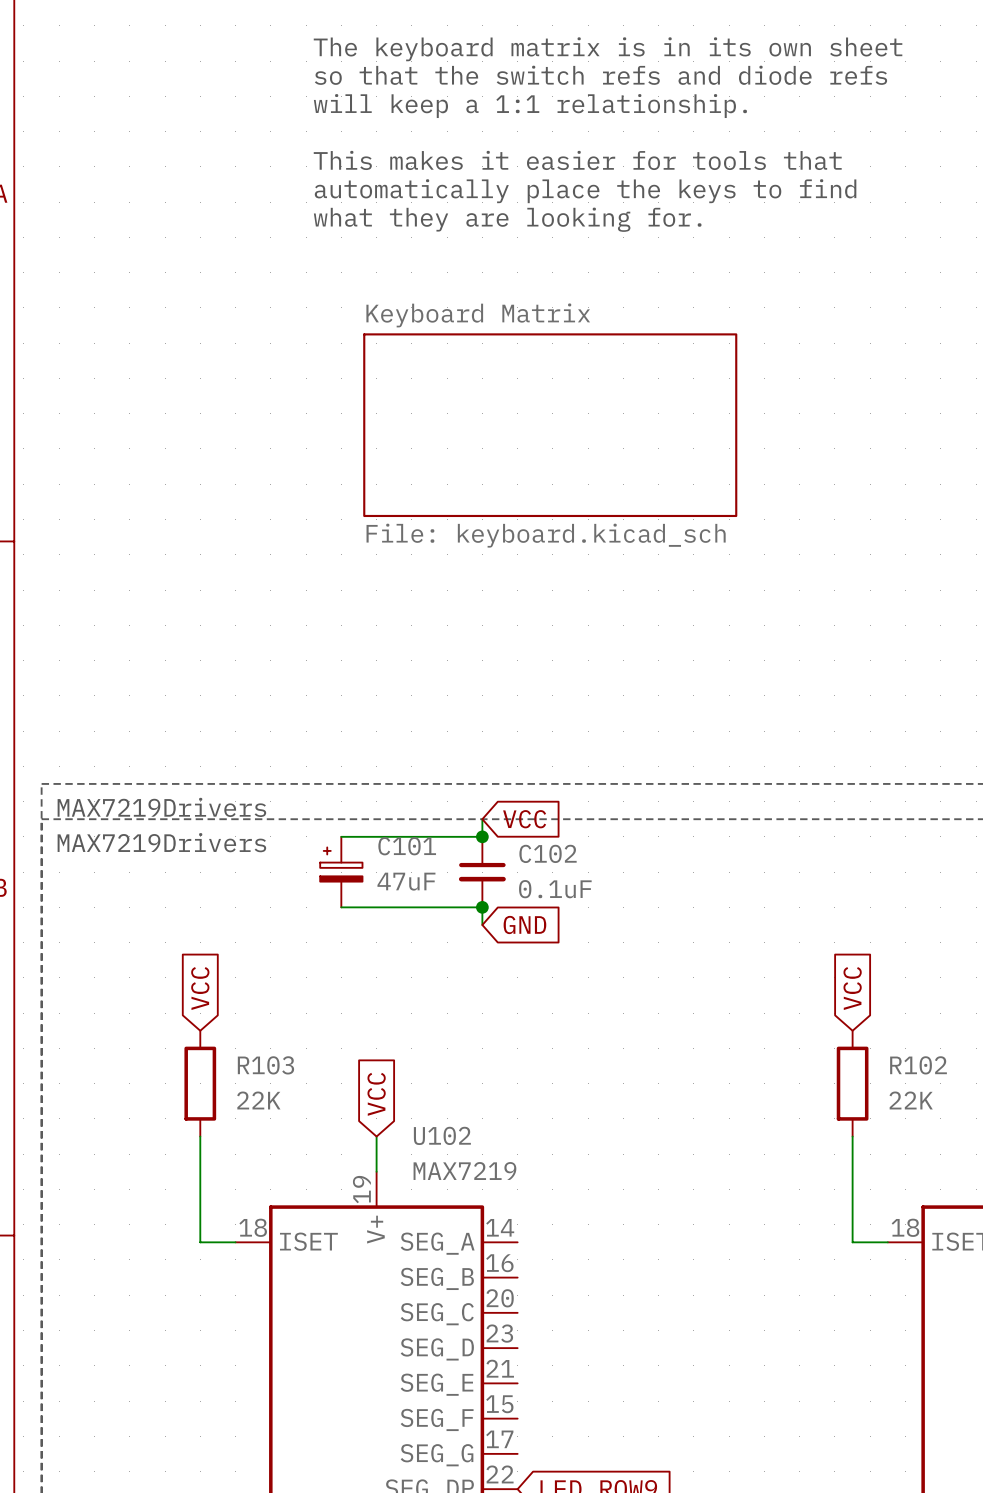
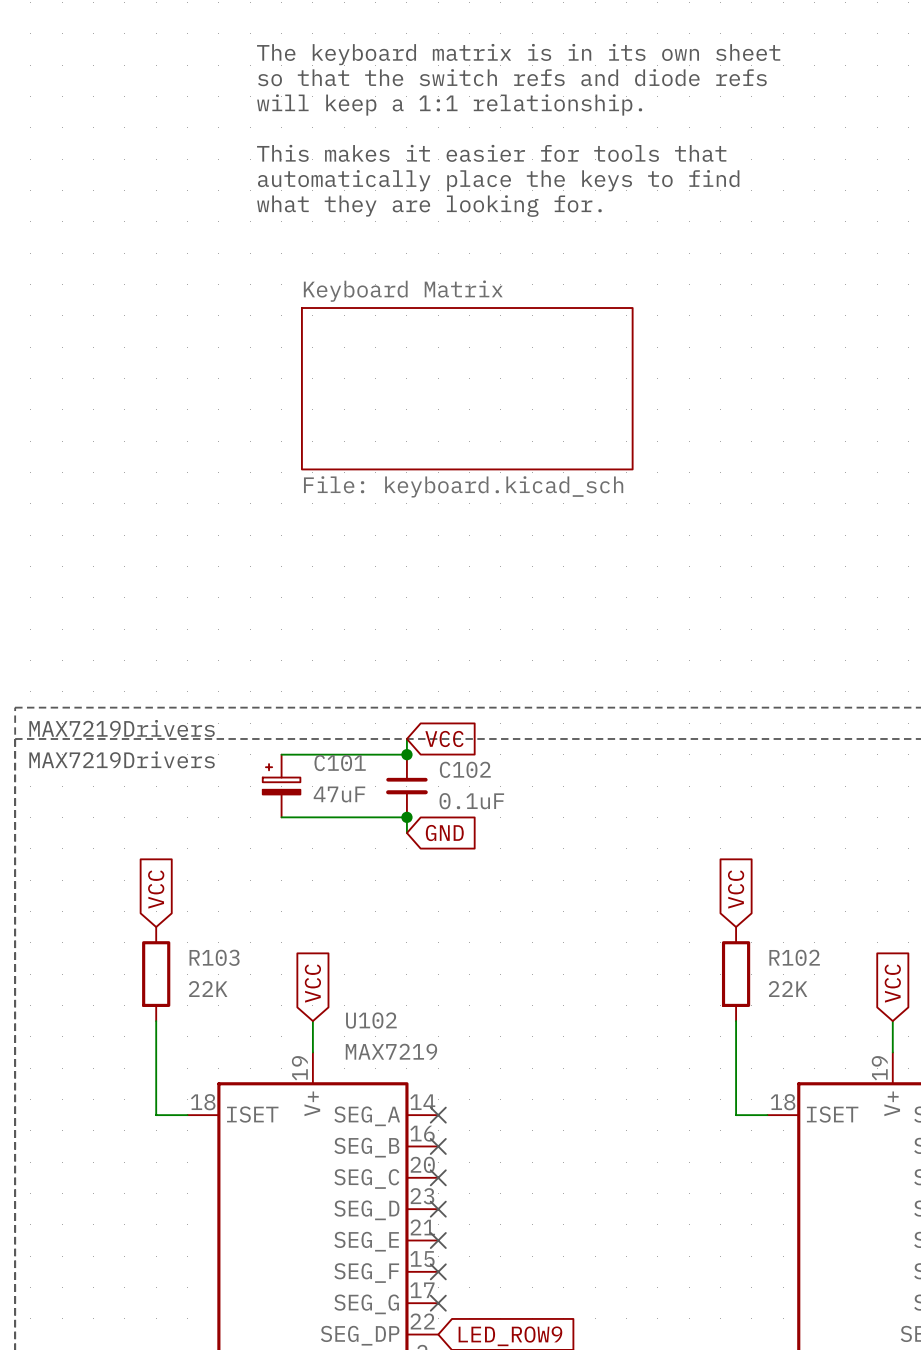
no-connect mark: none -> (438, 1115)
no-connect mark: none -> (438, 1146)
no-connect mark: none -> (438, 1177)
no-connect mark: none -> (438, 1209)
no-connect mark: none -> (438, 1240)
no-connect mark: none -> (438, 1271)
no-connect mark: none -> (438, 1303)

